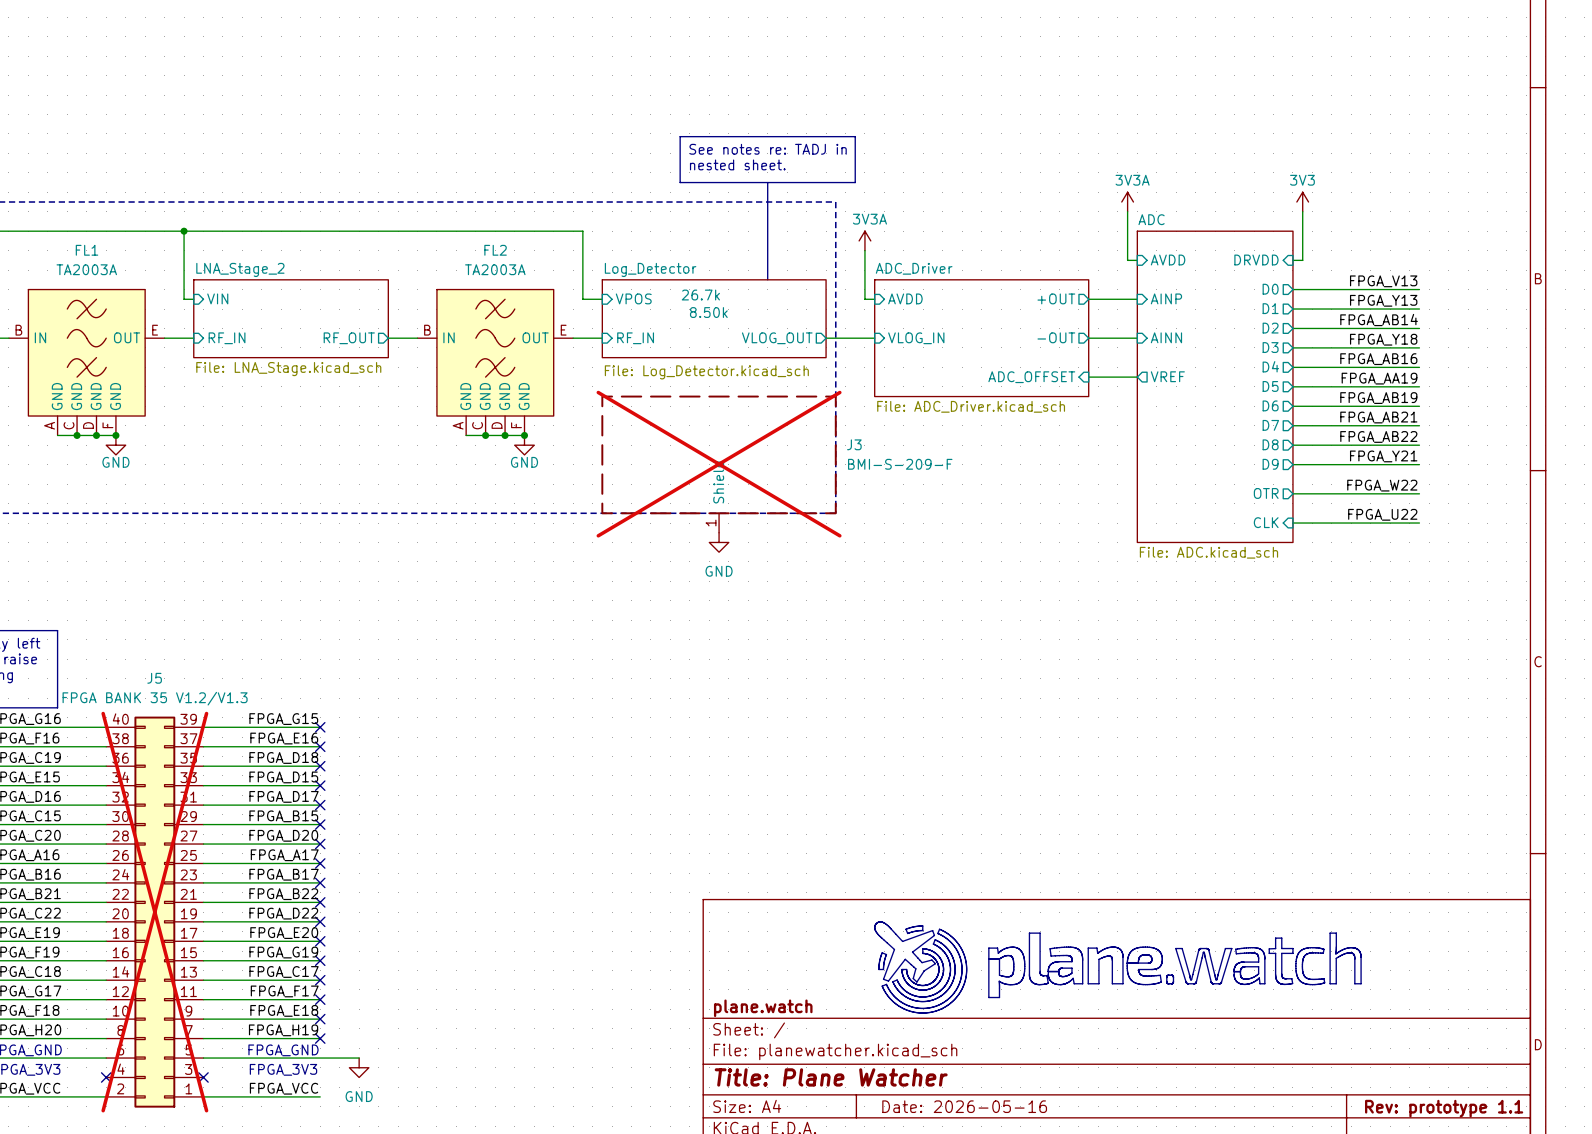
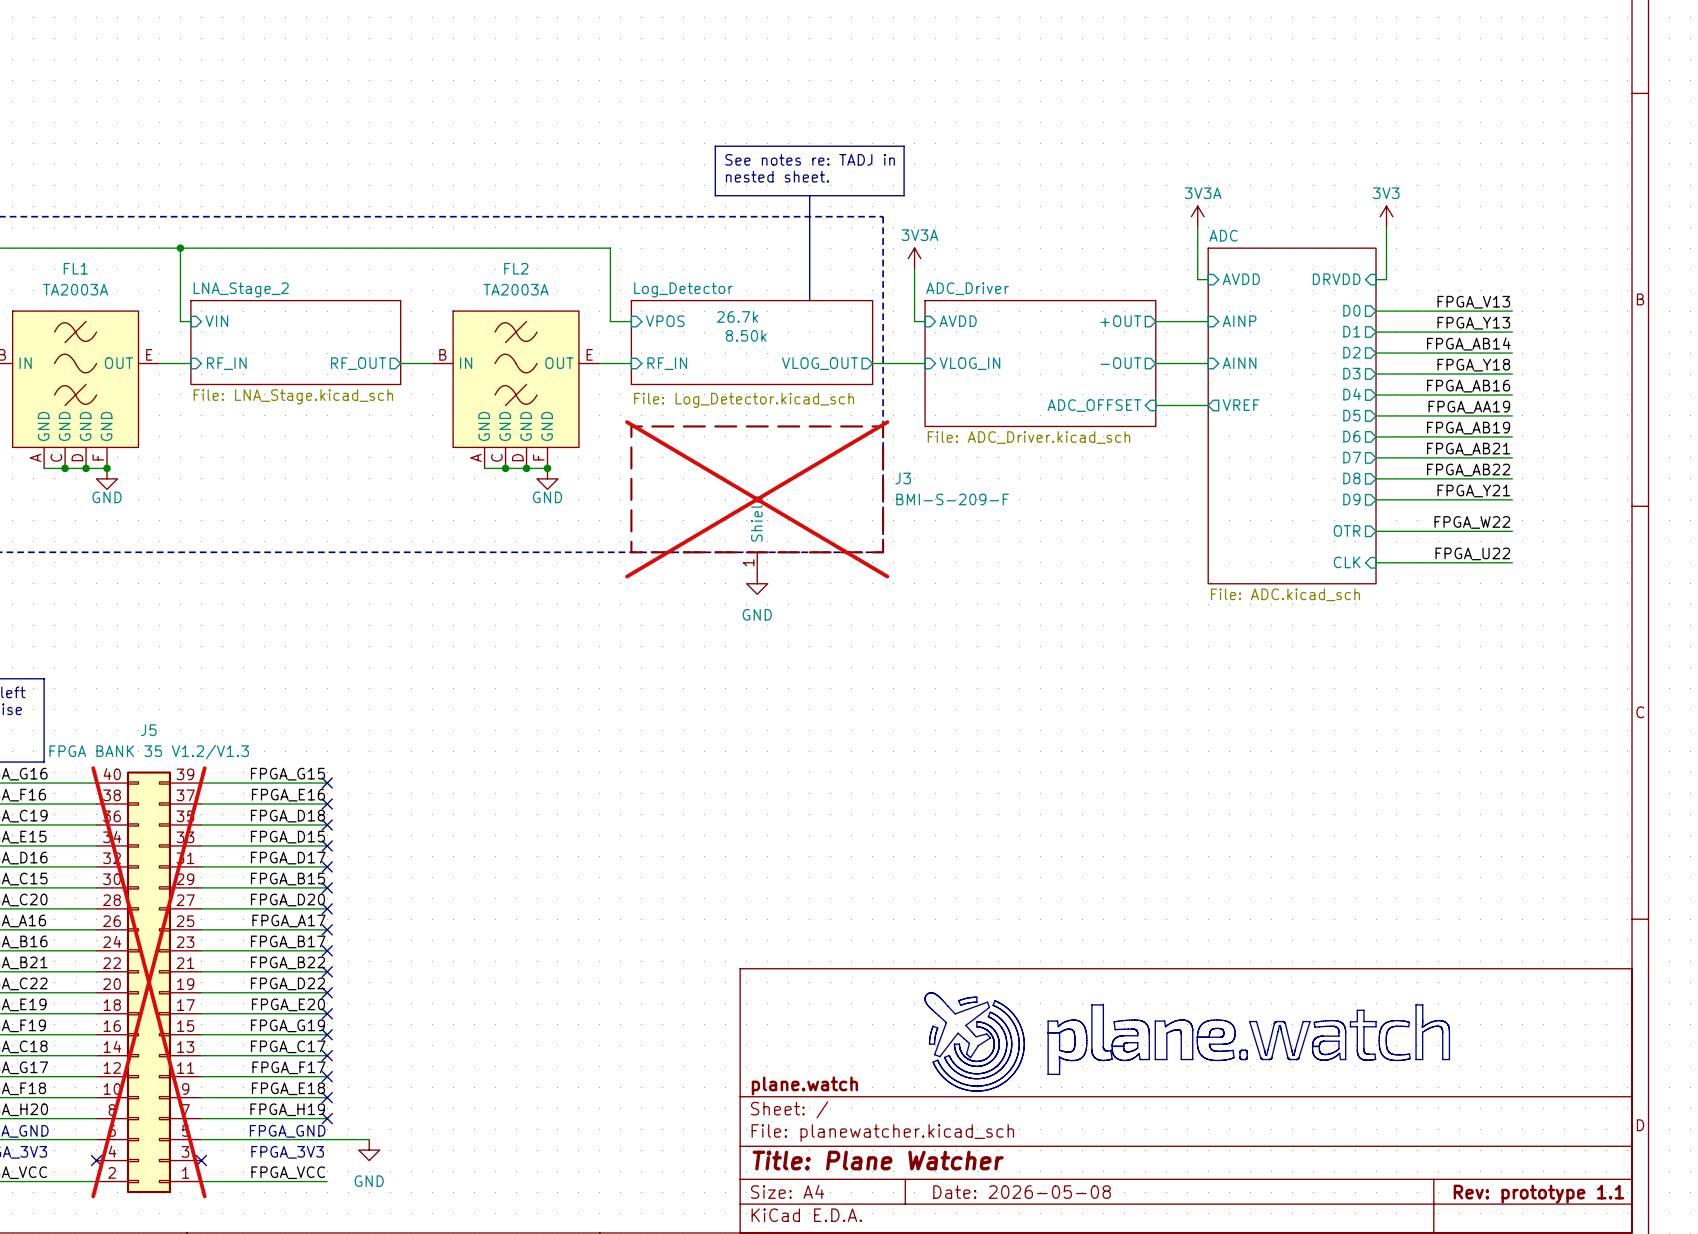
title block: Date: 2026-05-16 (964, 1106) -> Date: 2026-05-08 (1022, 1192)

